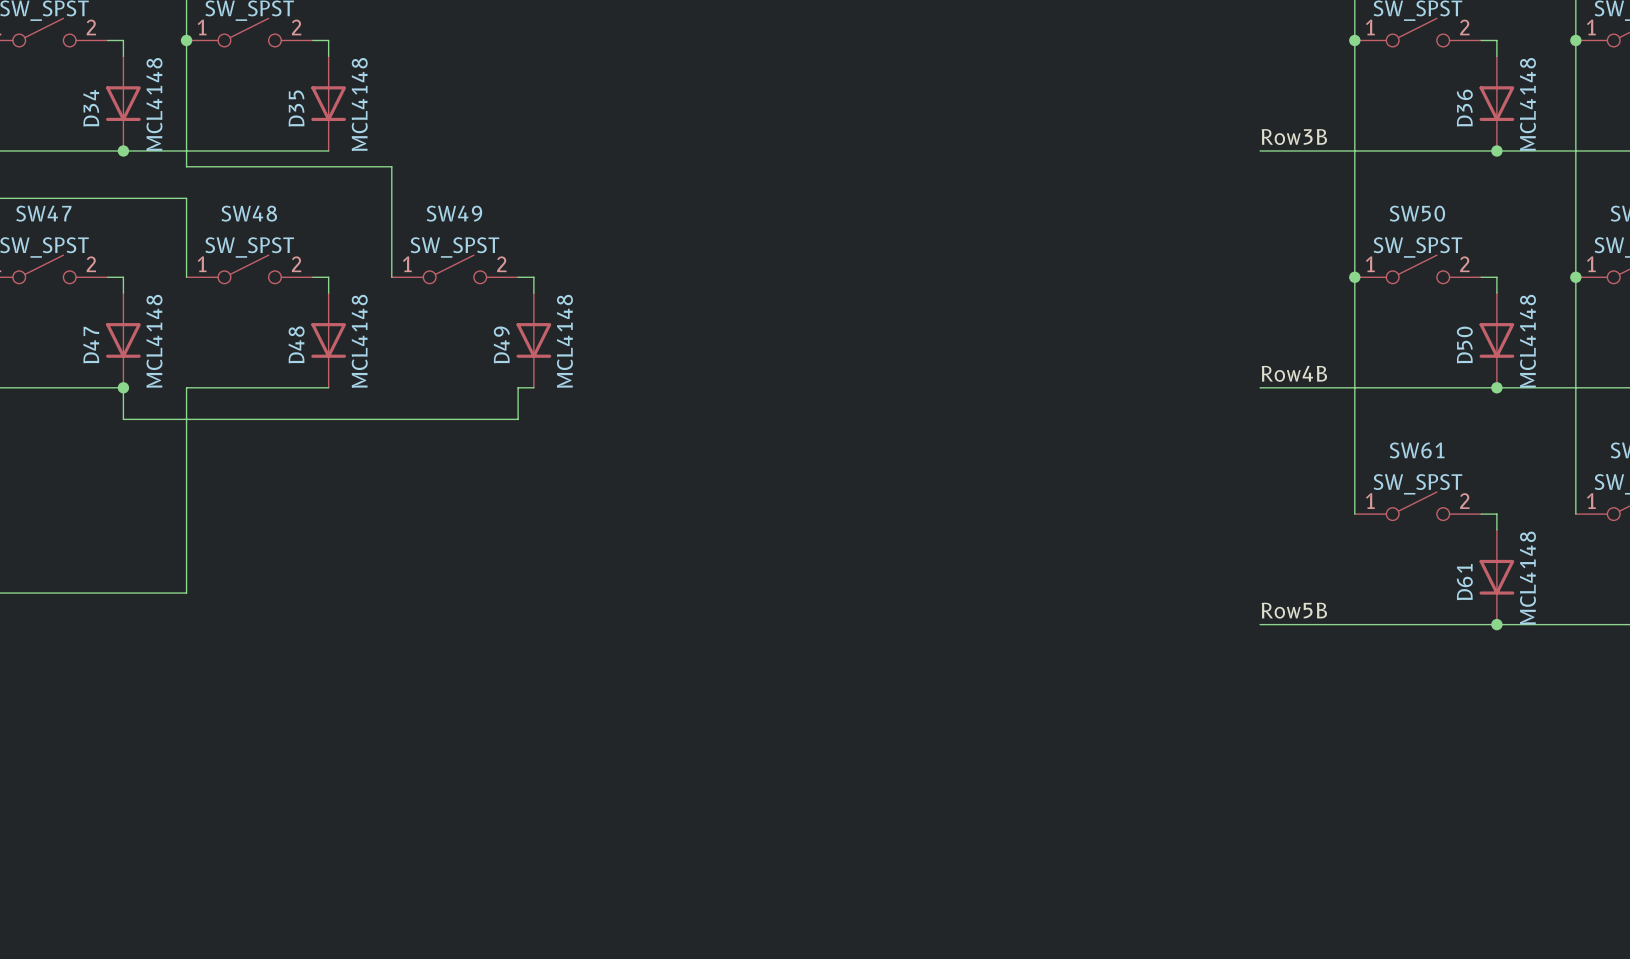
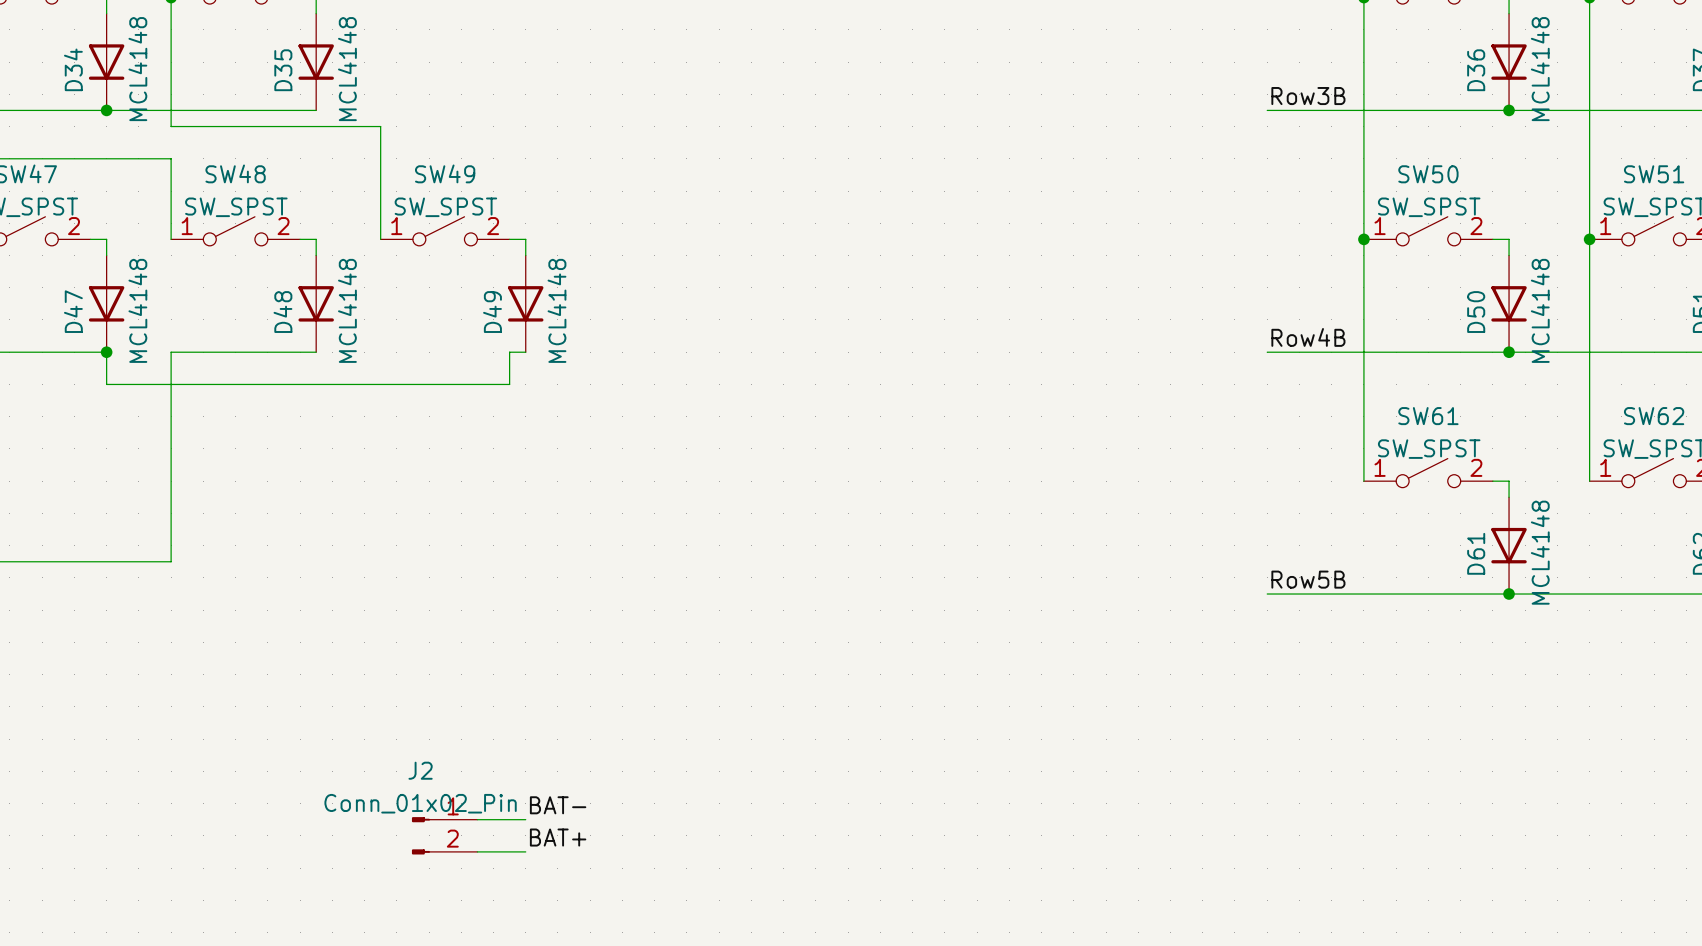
label: none -> BAT- (558, 805)
wire: none -> (477, 819) (525, 819)
J2: none -> Conn_01x02_Pin (444, 835)
label: none -> BAT+ (558, 837)
wire: none -> (477, 851) (525, 851)

